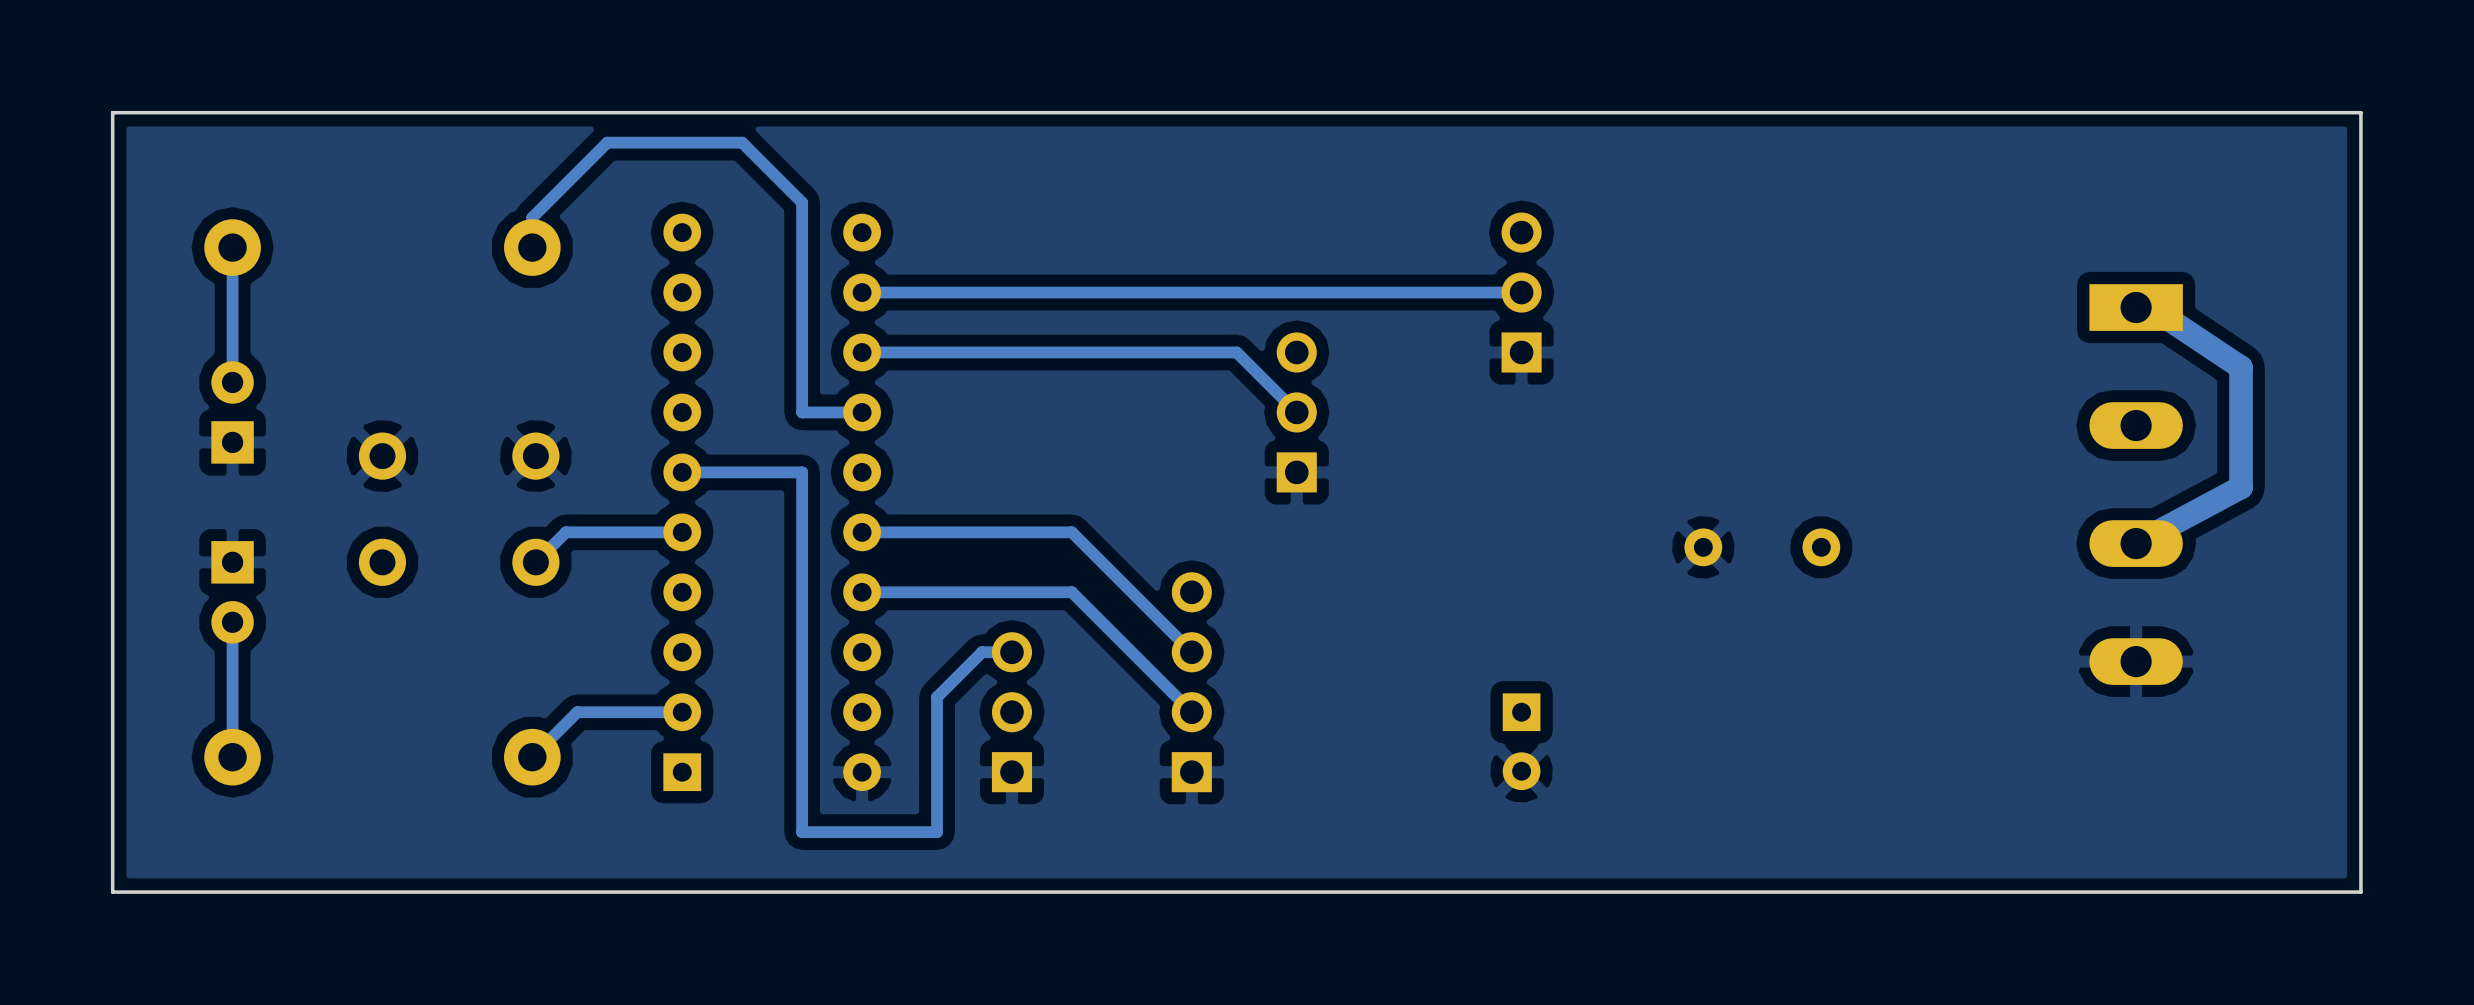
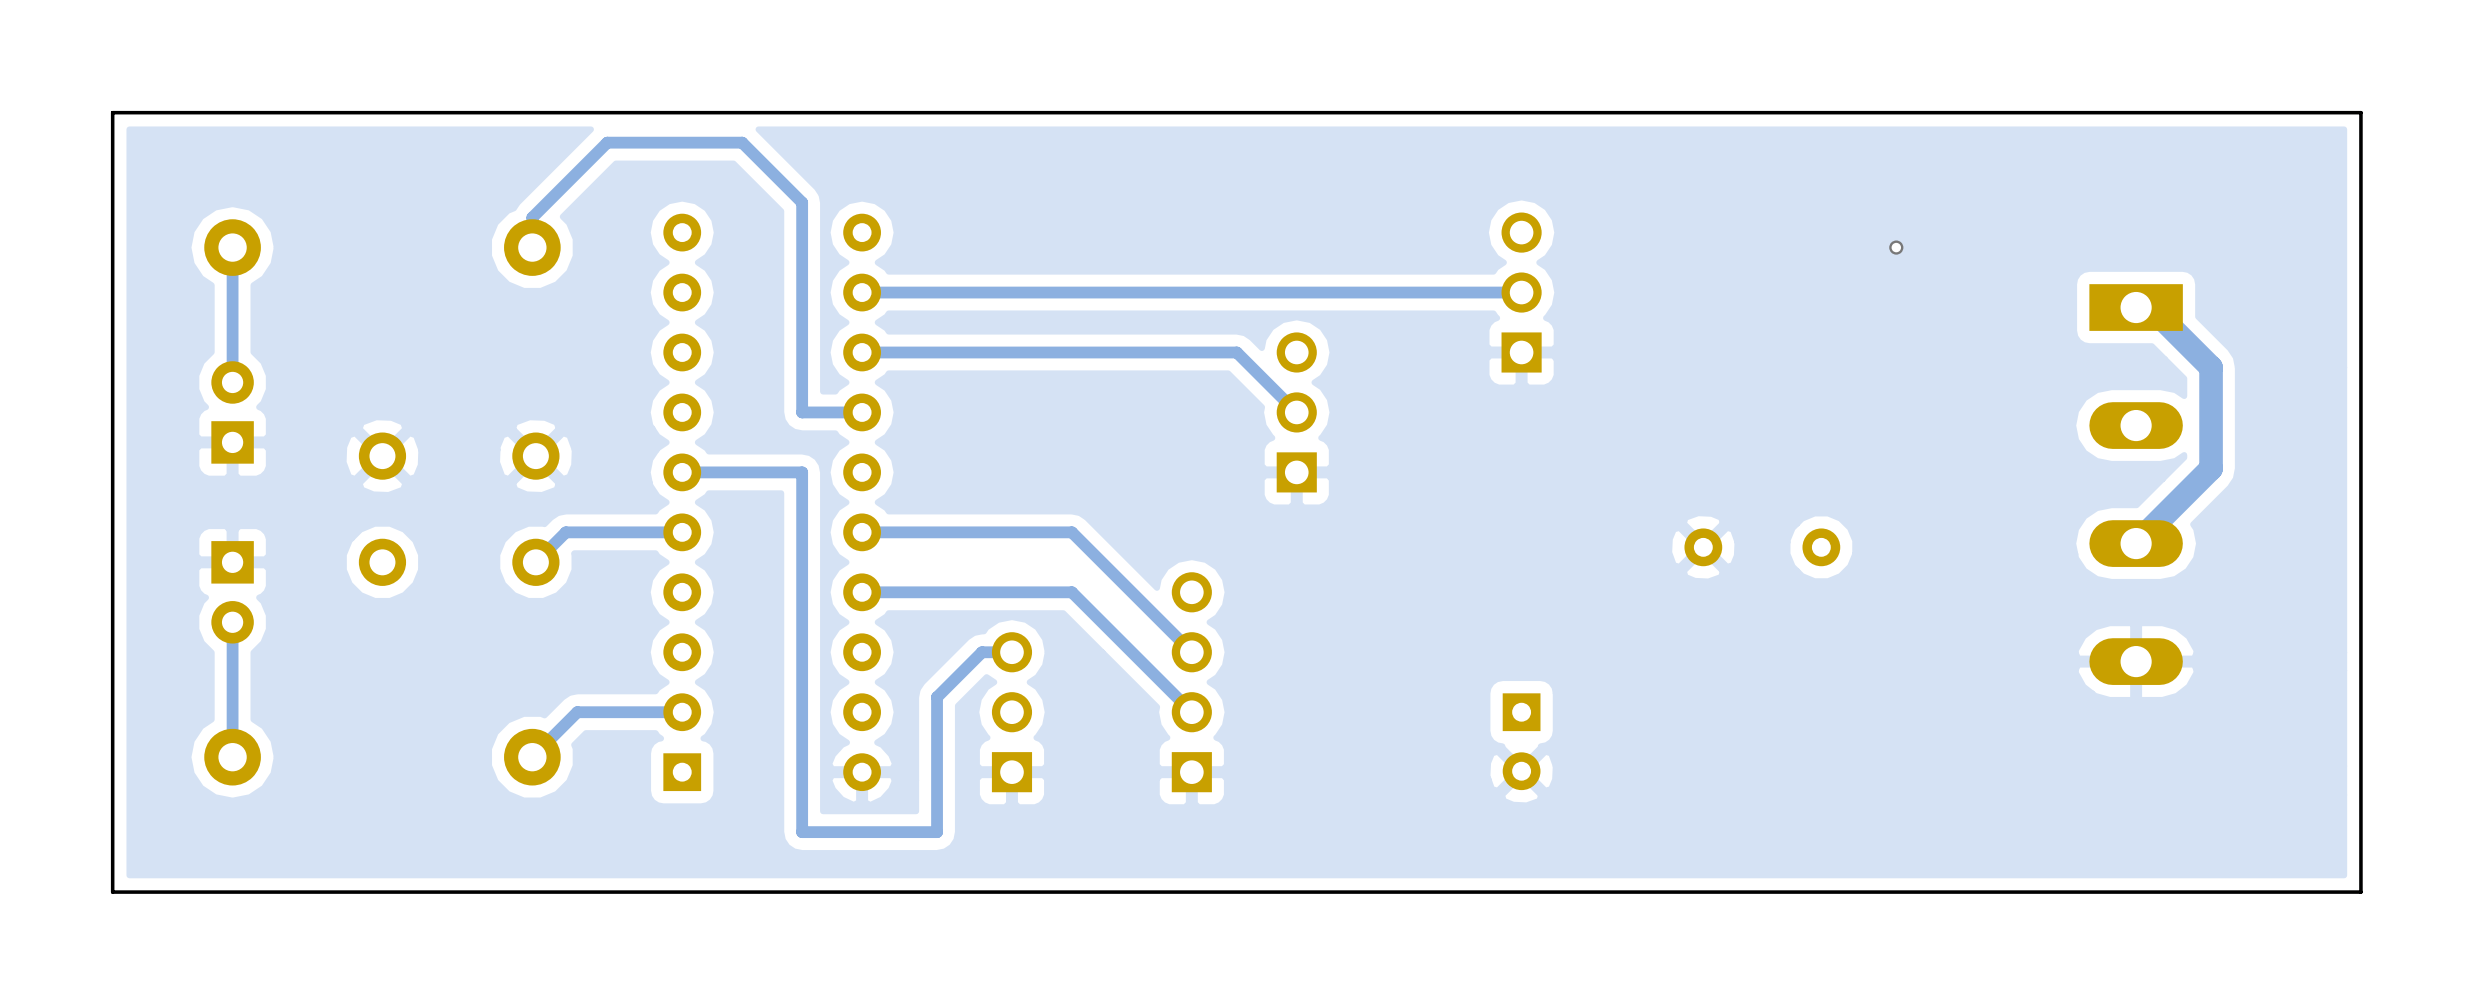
via: none -> (1896, 247)
track: (2151, 307) (2241, 367) (2241, 487) (2136, 543) -> (2151, 307) (2211, 367) (2211, 468) (2136, 543)

